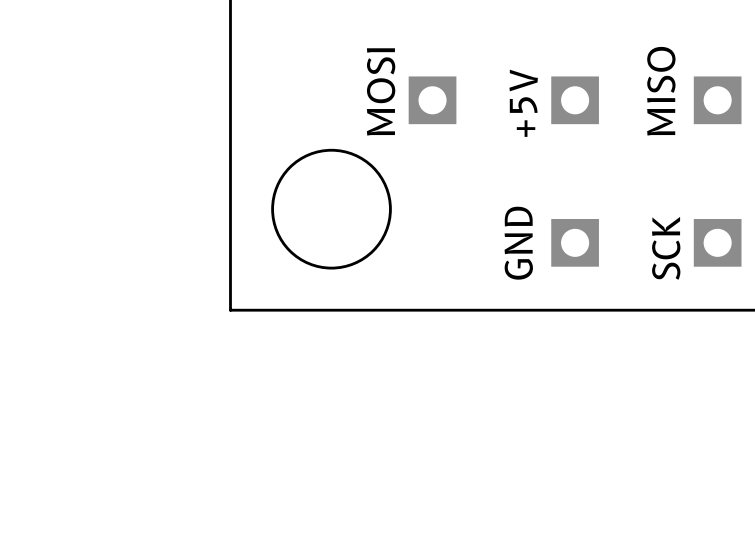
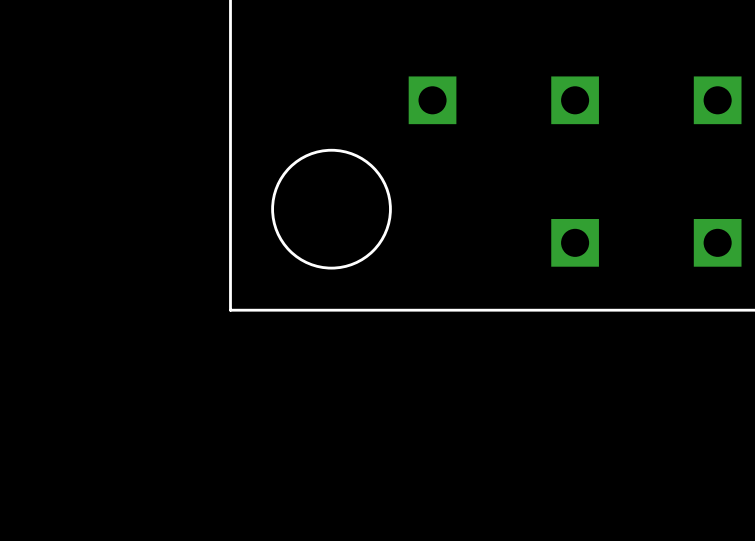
text: MOSI (381, 91) -> none
text: MISO (661, 91) -> none
text: +5V (523, 103) -> none
text: GND (518, 243) -> none
text: SCK (666, 248) -> none

